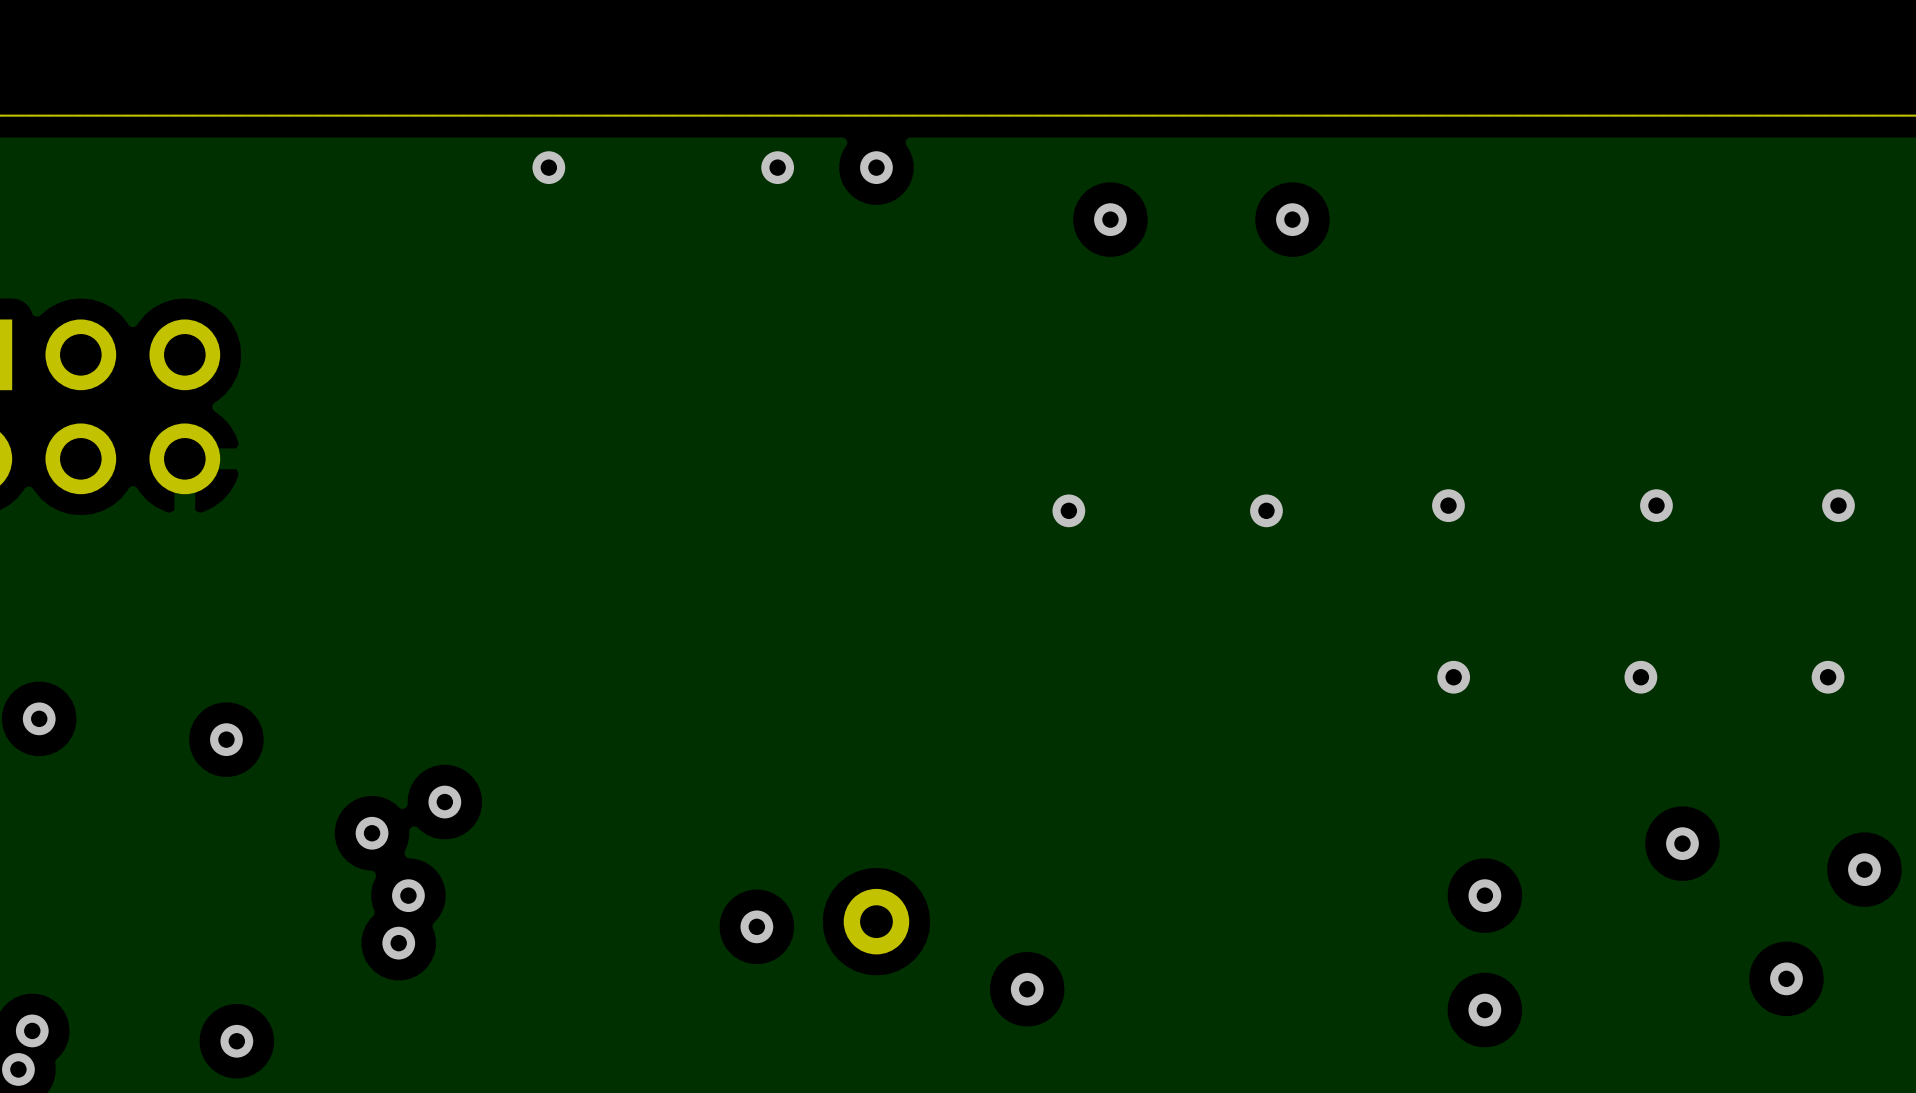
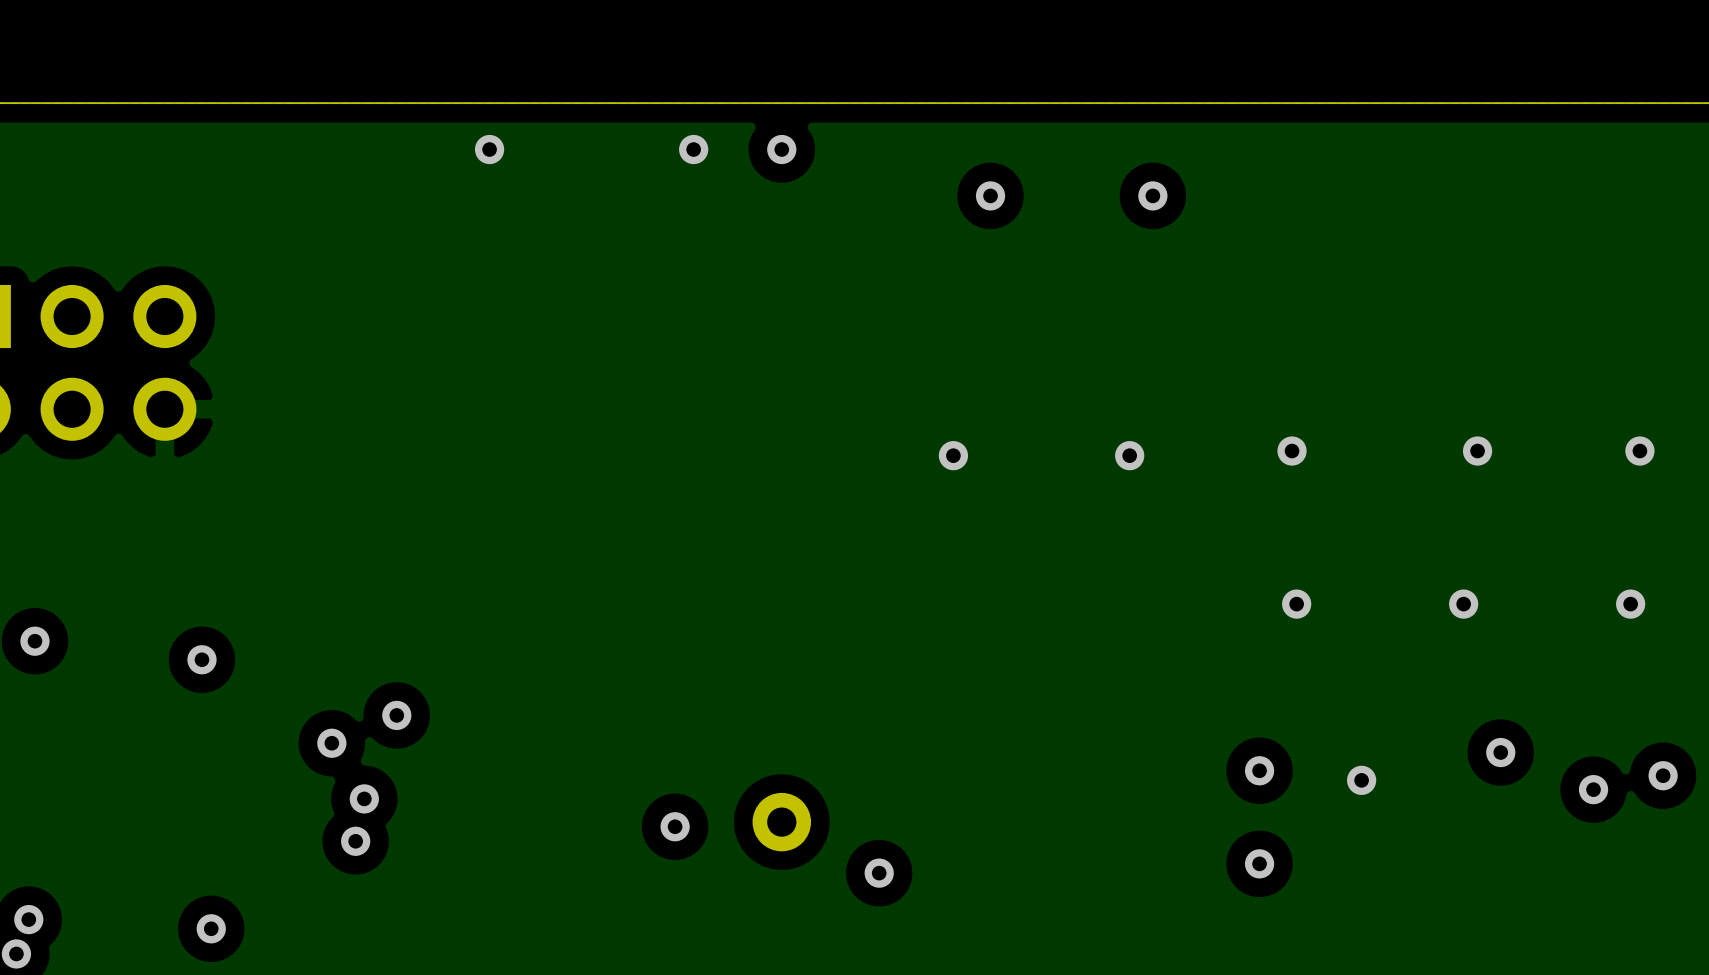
via: none -> (1259, 770)
via: none -> (1361, 780)
via: (1484, 895) -> none
via: none -> (1259, 863)
via position: (1786, 978) -> (1593, 789)
via position: (1027, 989) -> (879, 873)
via: (1484, 1010) -> none

